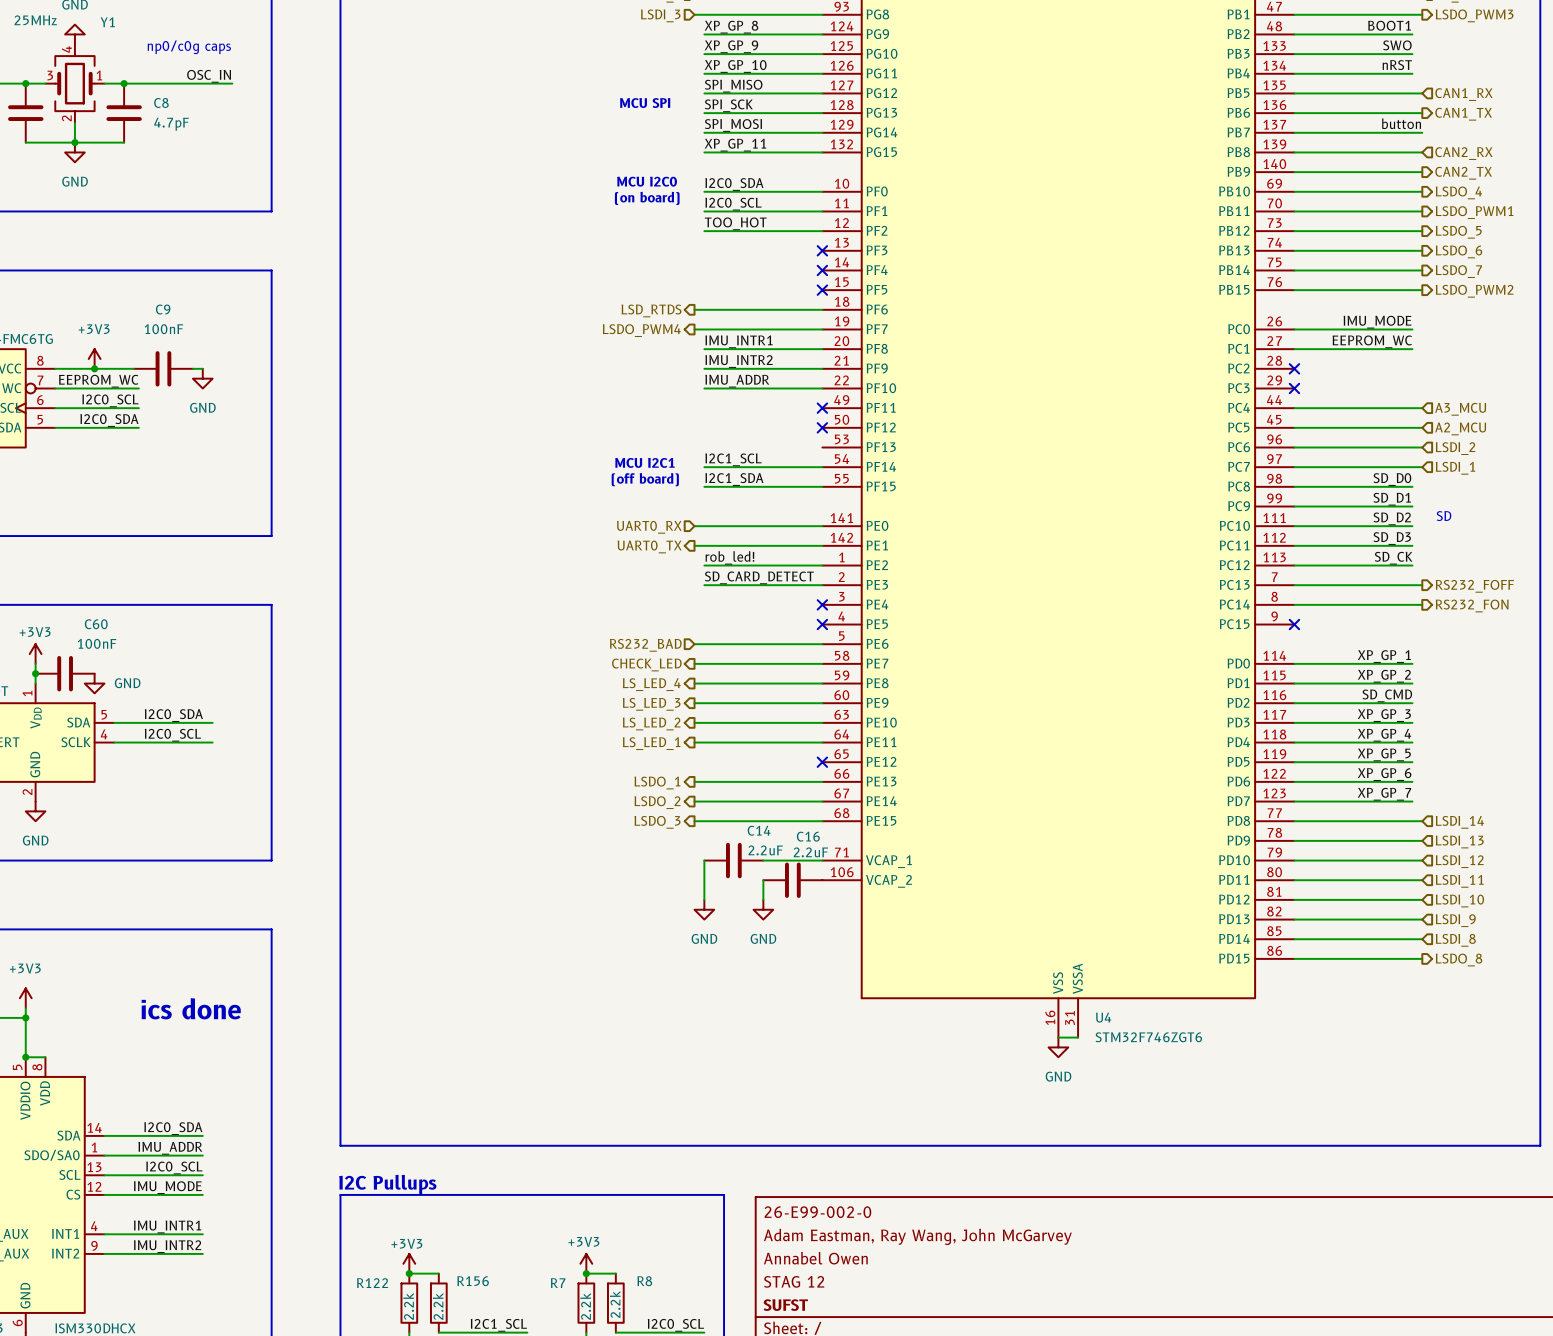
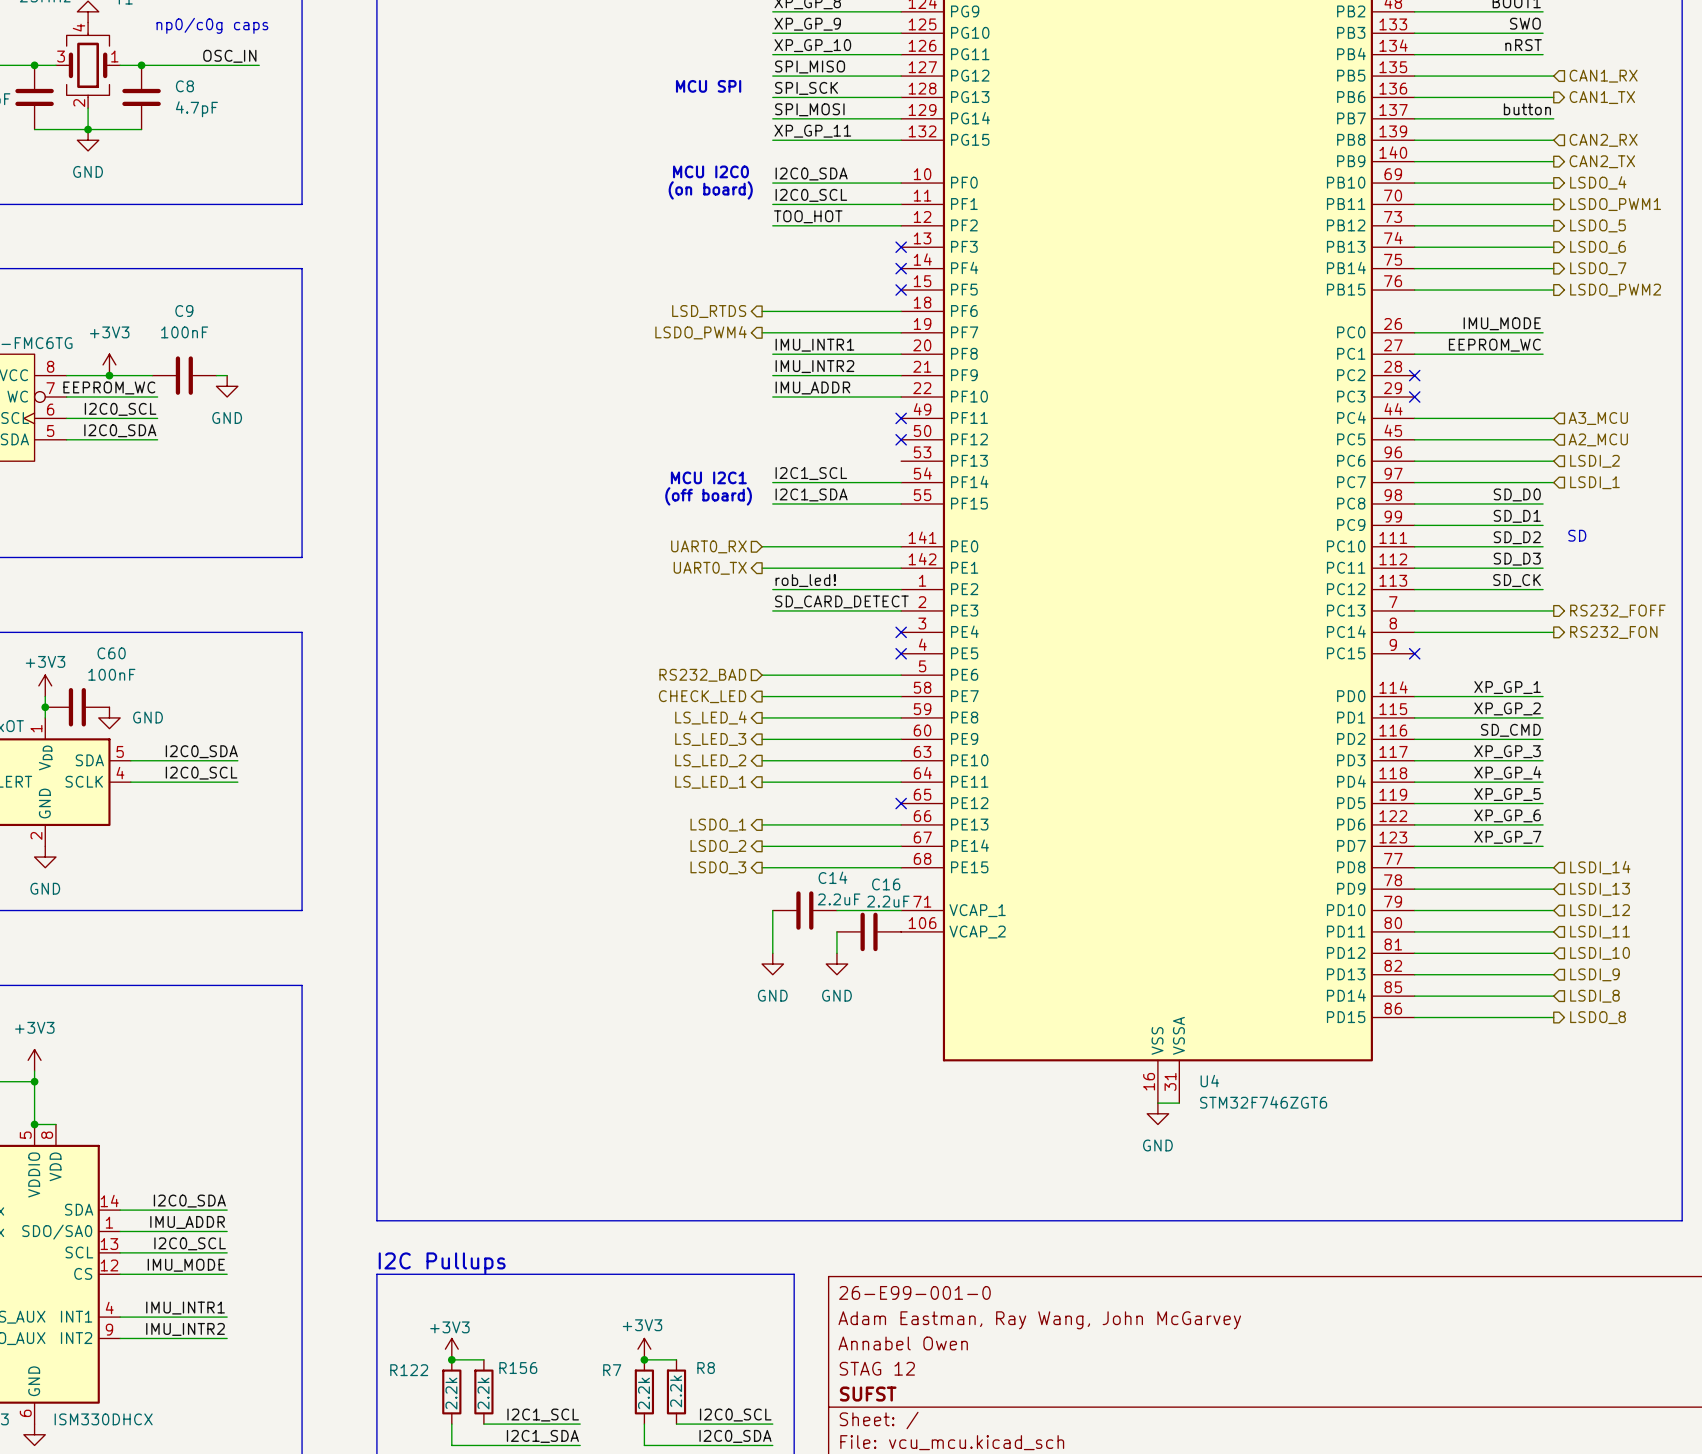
text: ics done (191, 1008) -> none
title block: 26-E99-002-0 (817, 1212) -> 26-E99-001-0 (914, 1292)

